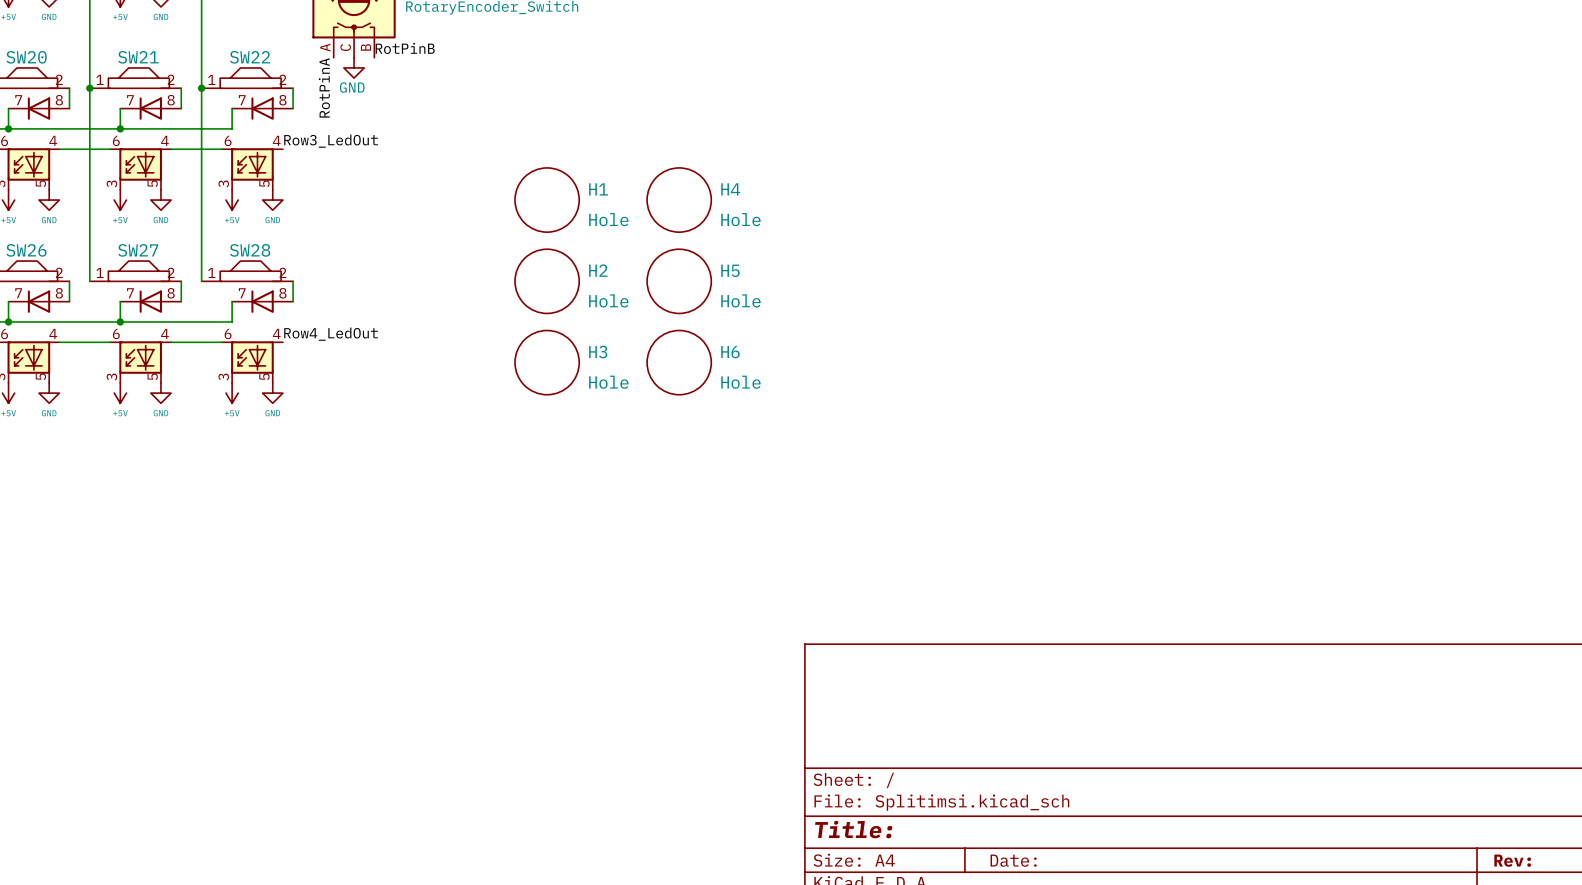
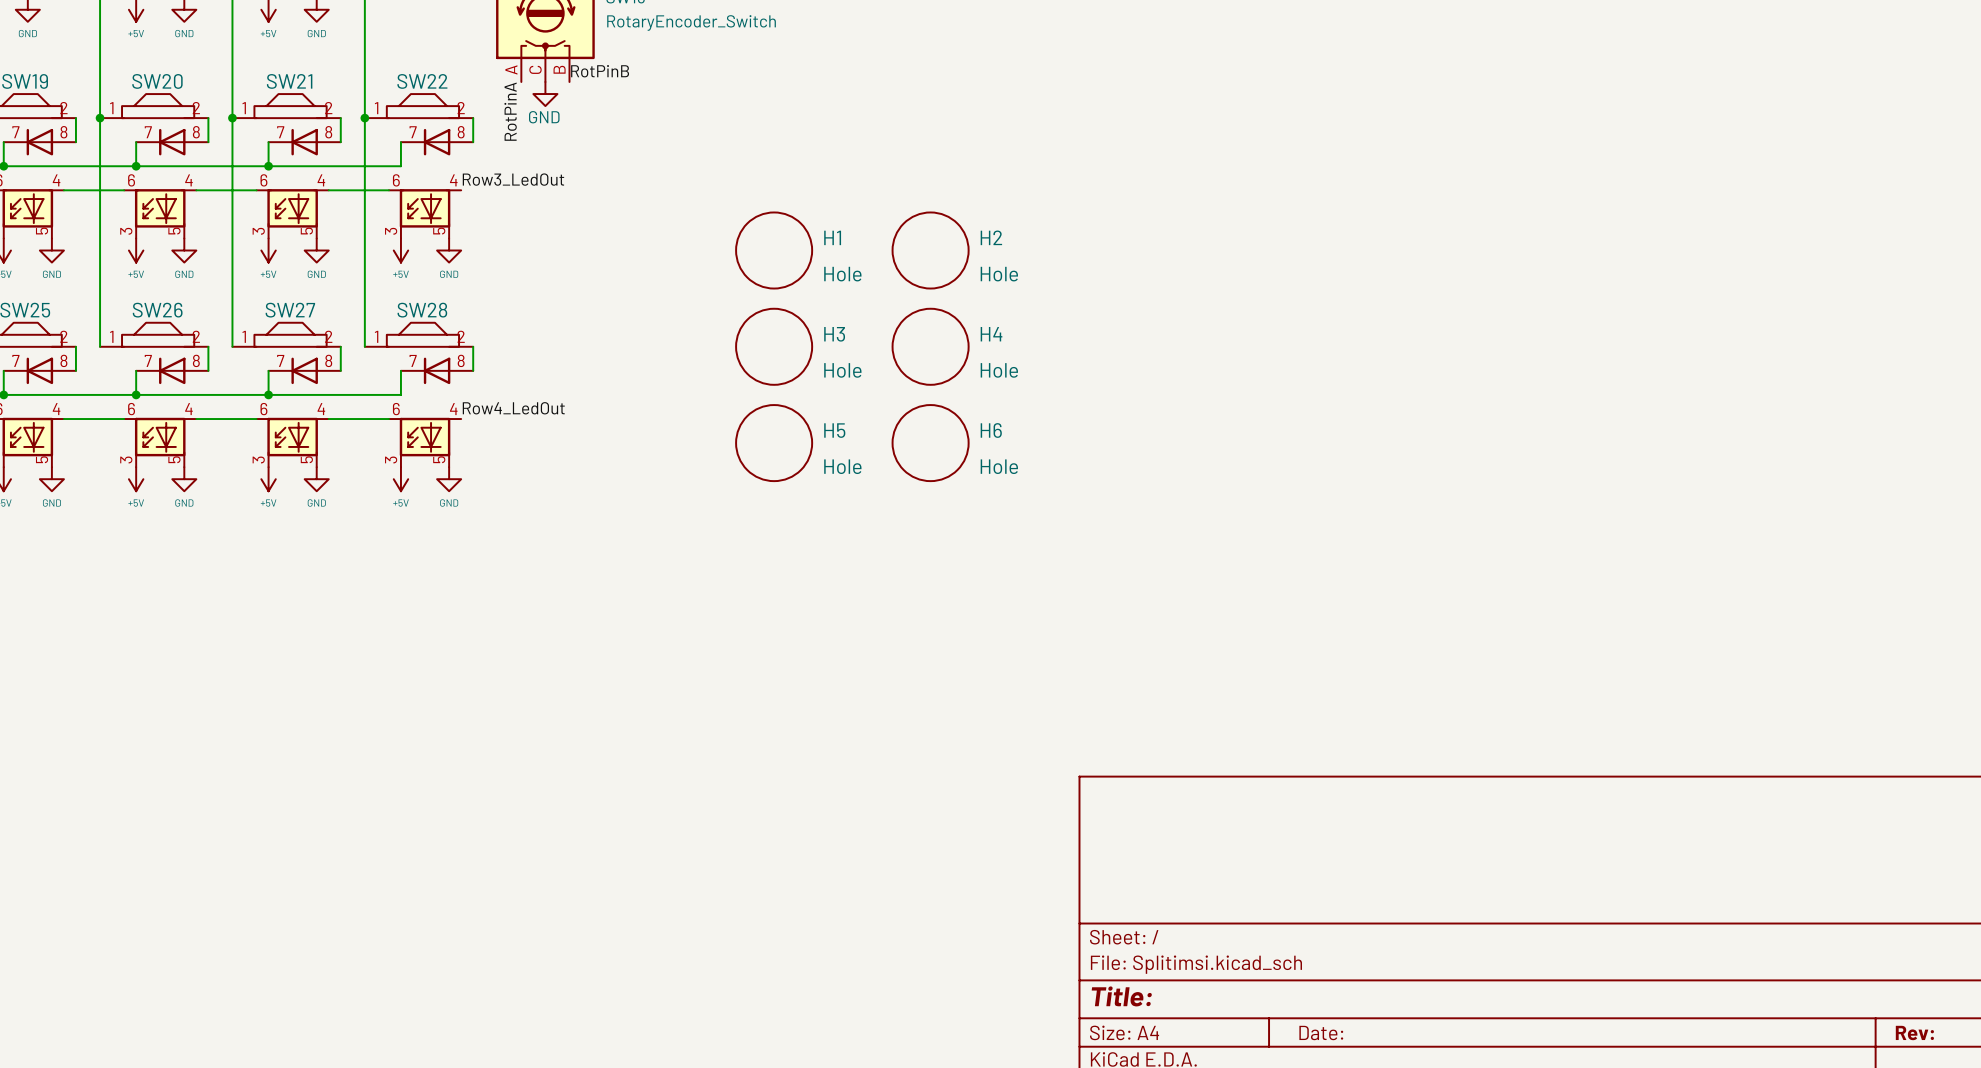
H4 name: H4 (730, 189) -> H2 (991, 237)
H2 name: H2 (598, 270) -> H3 (834, 334)
H5 name: H5 (730, 270) -> H4 (991, 334)
H3 name: H3 (598, 352) -> H5 (834, 430)

